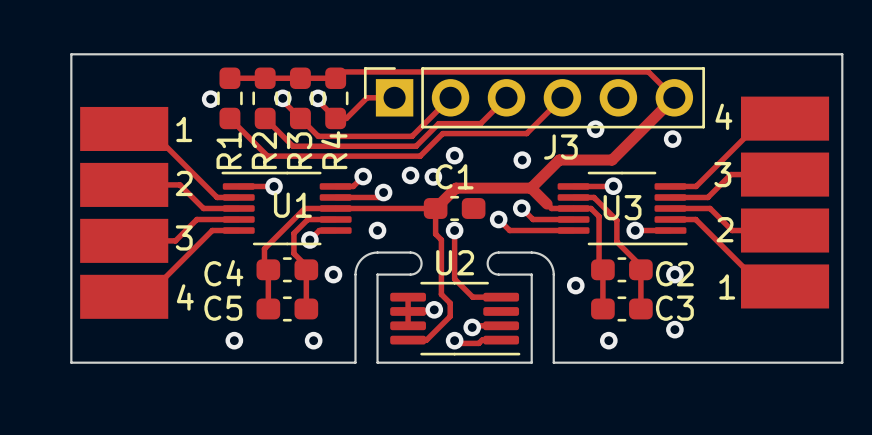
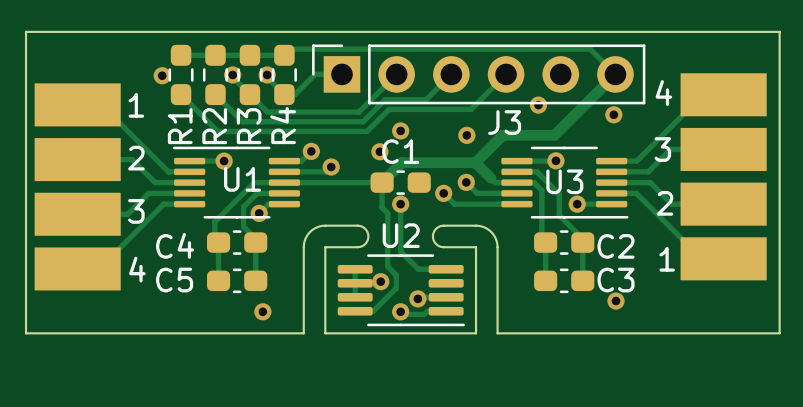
via: (410, 175) -> none
via: (377, 230) -> none
via: (333, 274) -> none
via: (674, 274) -> none
via: (575, 285) -> none
via: (234, 340) -> none
via: (608, 340) -> none

